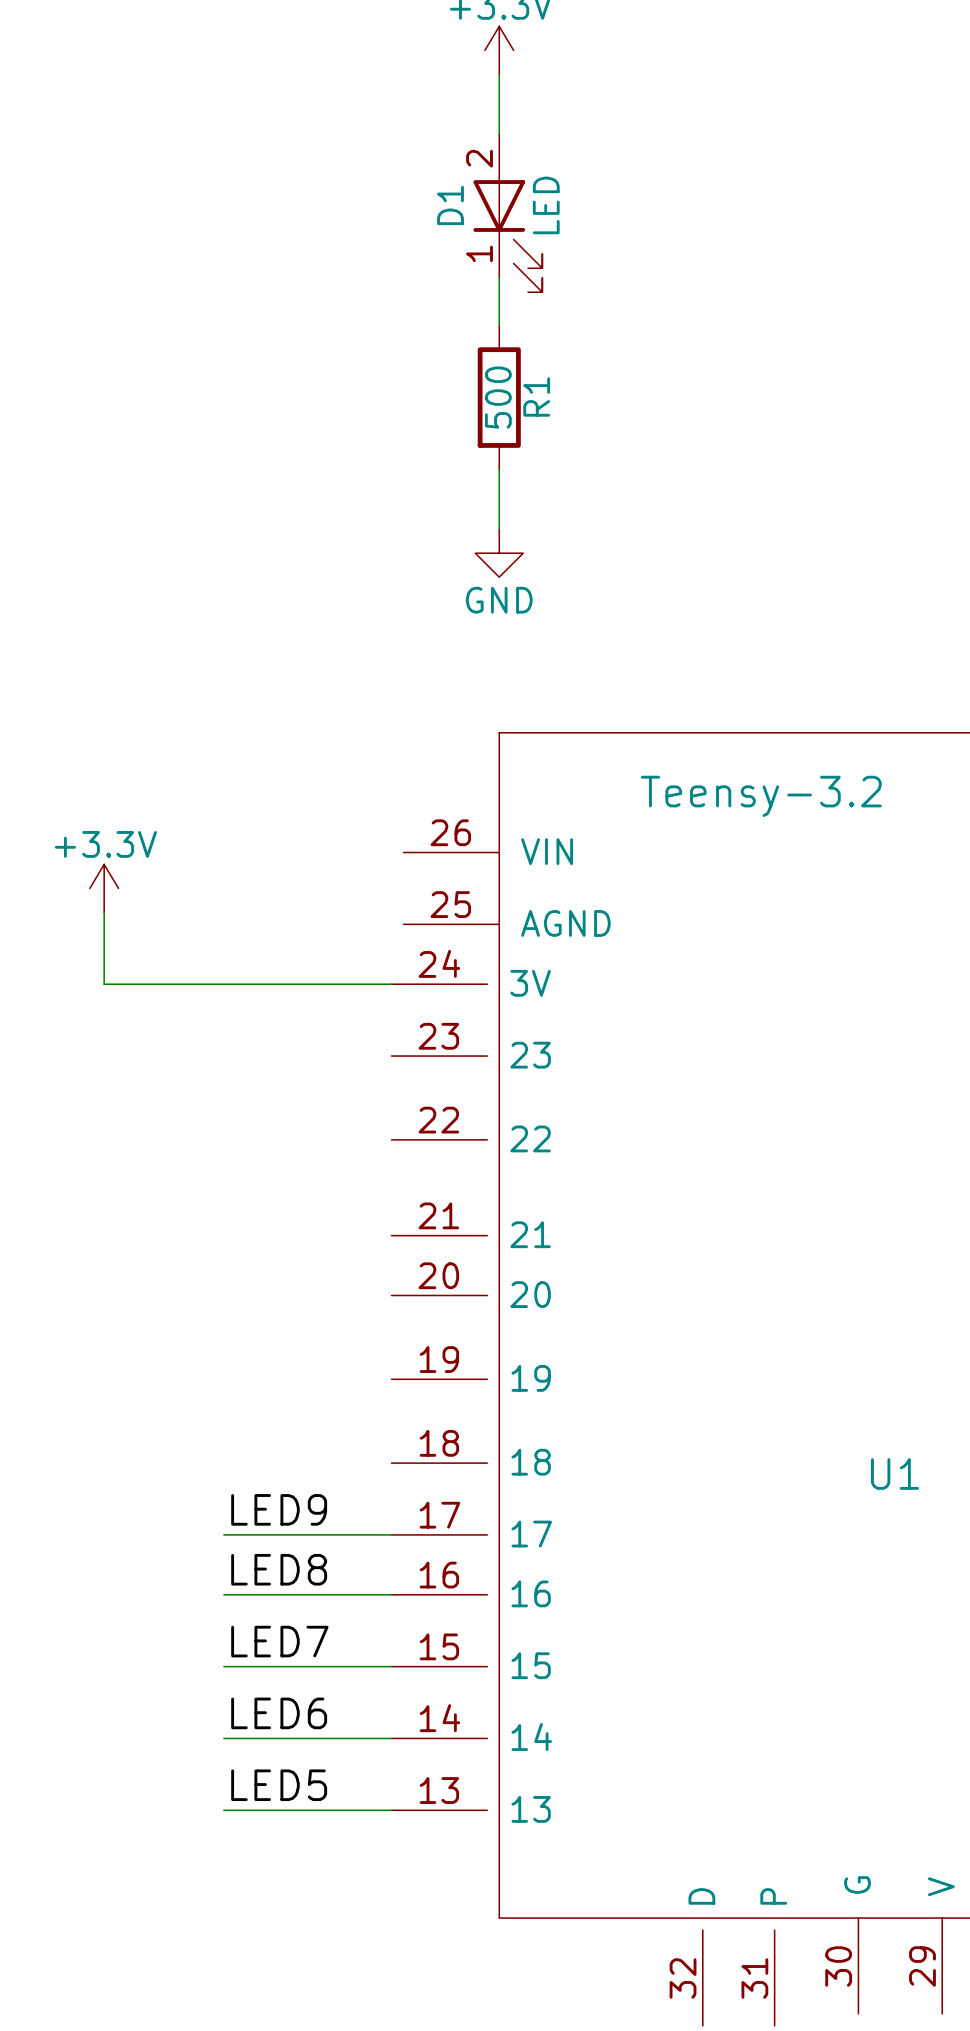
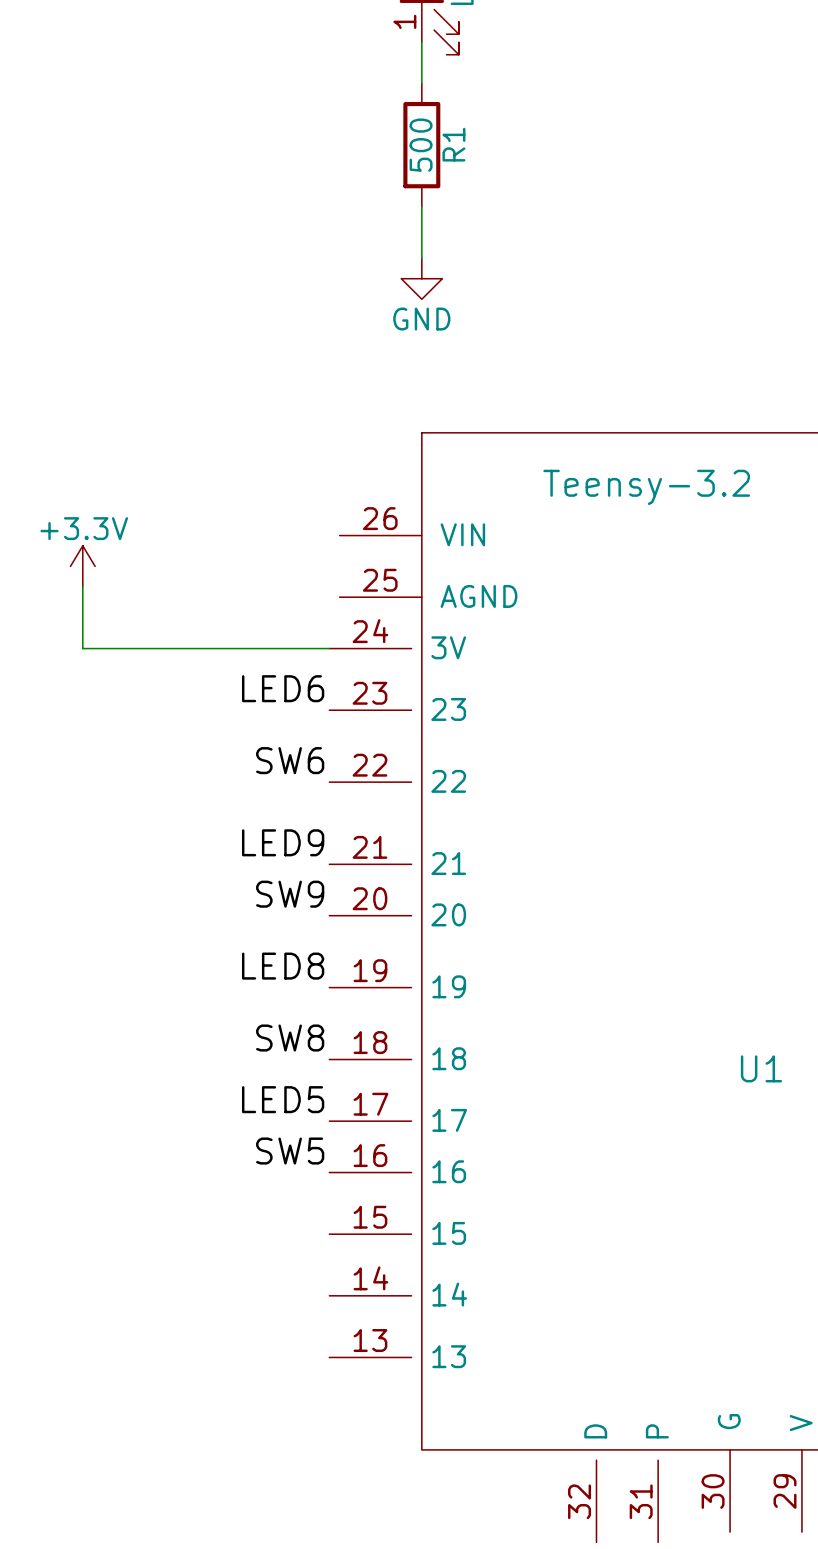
label: none -> LED6 (283, 688)
label: none -> SW6 (290, 760)
label: none -> SW9 (290, 894)
label: none -> SW8 (290, 1038)
label position: LED9 (279, 1509) -> LED9 (283, 842)
wire: (223, 1534) (391, 1534) -> none
label position: LED8 (279, 1569) -> LED8 (283, 966)
label: none -> SW5 (290, 1151)
wire: (223, 1594) (391, 1594) -> none
label: LED7 (279, 1641) -> none
wire: (223, 1666) (391, 1666) -> none
label: LED6 (279, 1713) -> none
wire: (223, 1738) (391, 1738) -> none
label position: LED5 (279, 1785) -> LED5 (283, 1099)
wire: (223, 1810) (391, 1810) -> none

